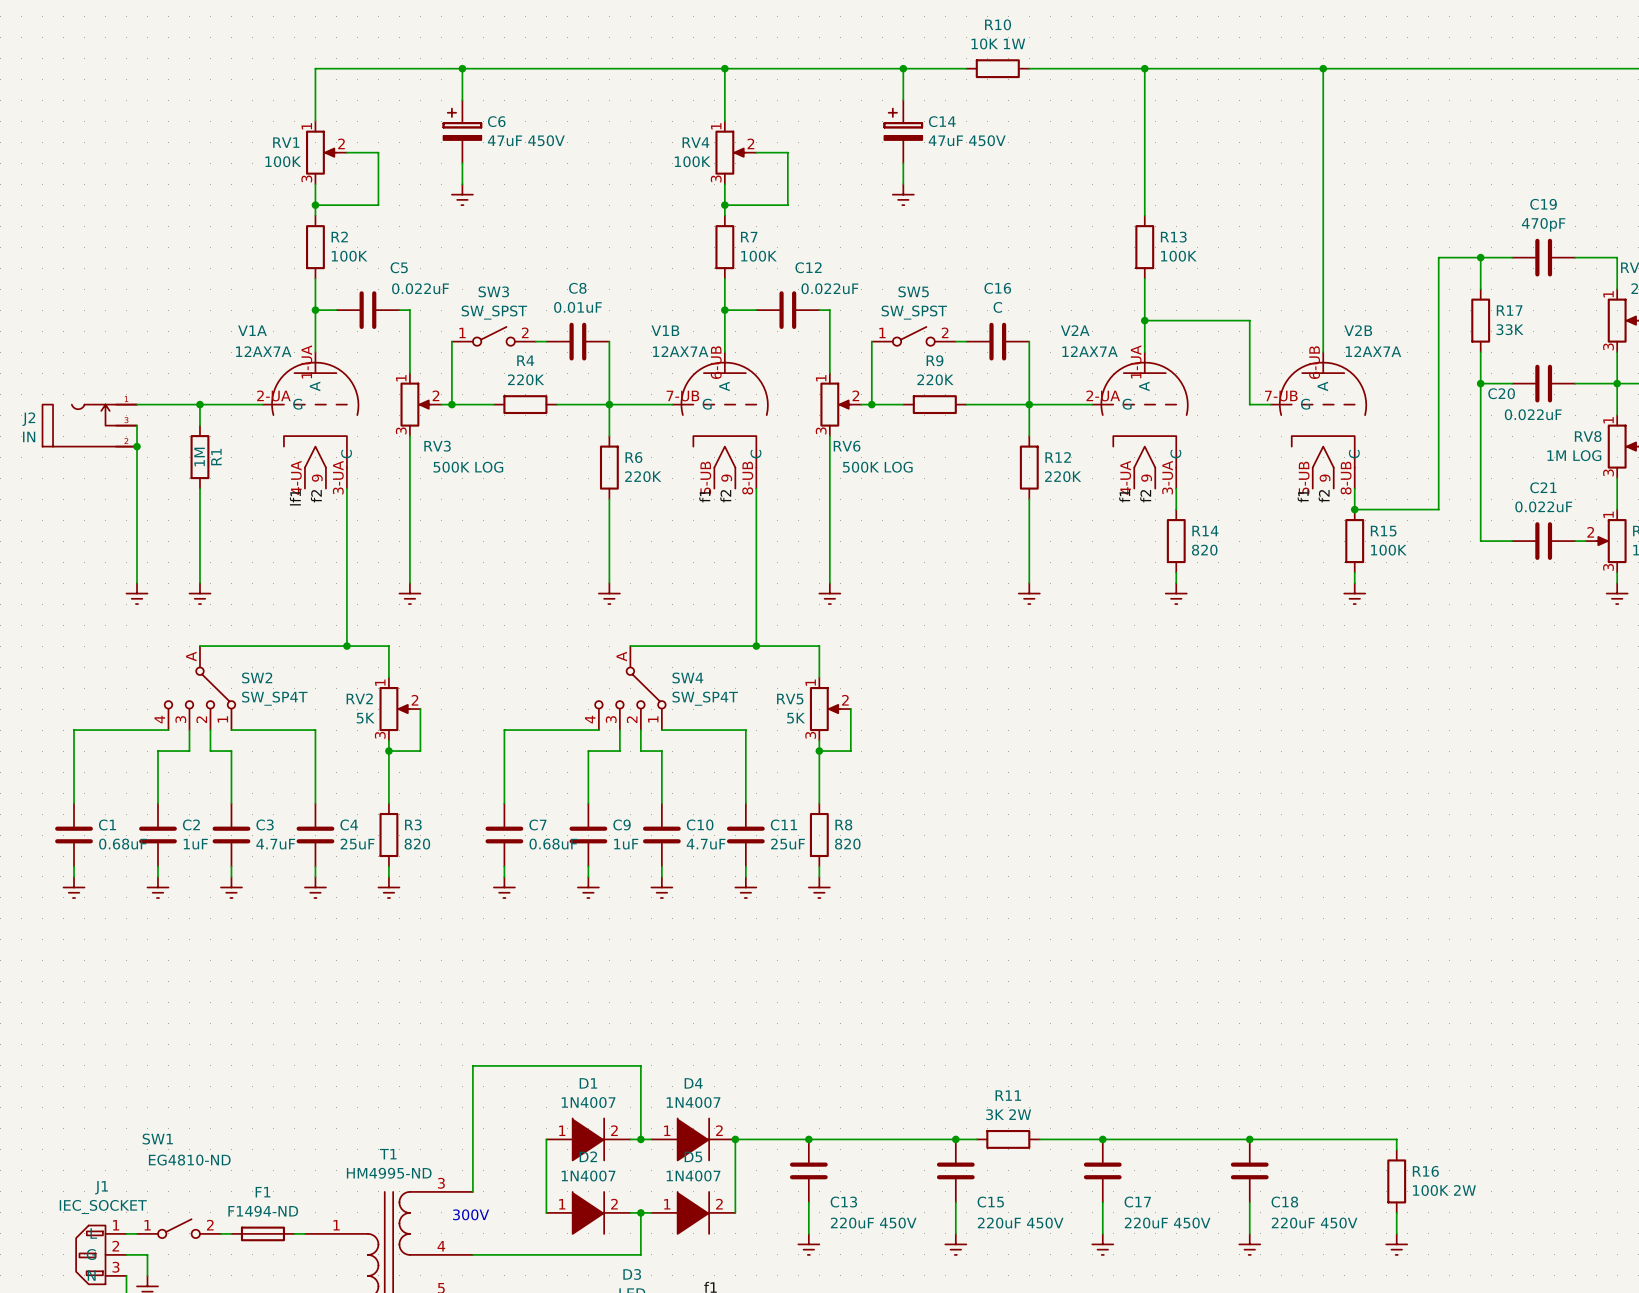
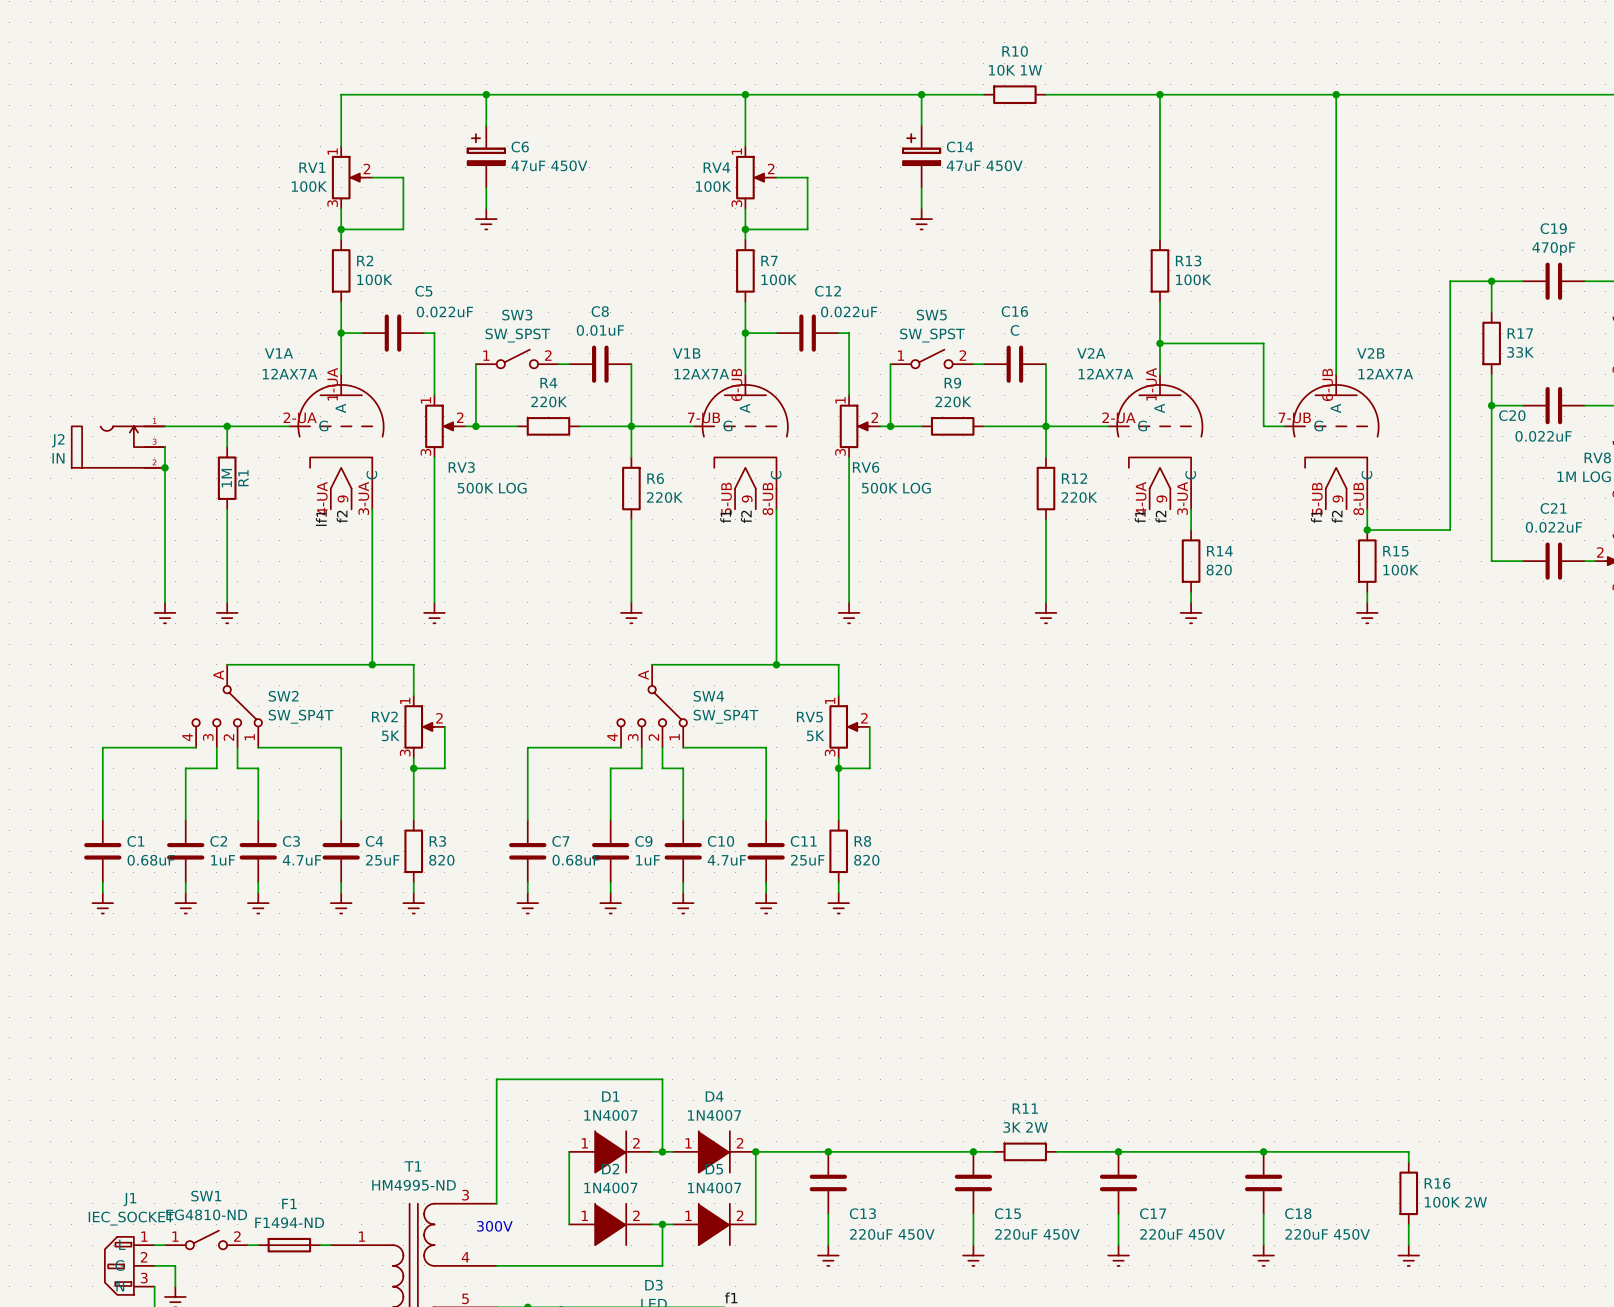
SW1 name position: SW1 (157, 1139) -> SW1 (206, 1196)
SW1 value position: EG4810-ND (189, 1160) -> EG4810-ND (206, 1214)

